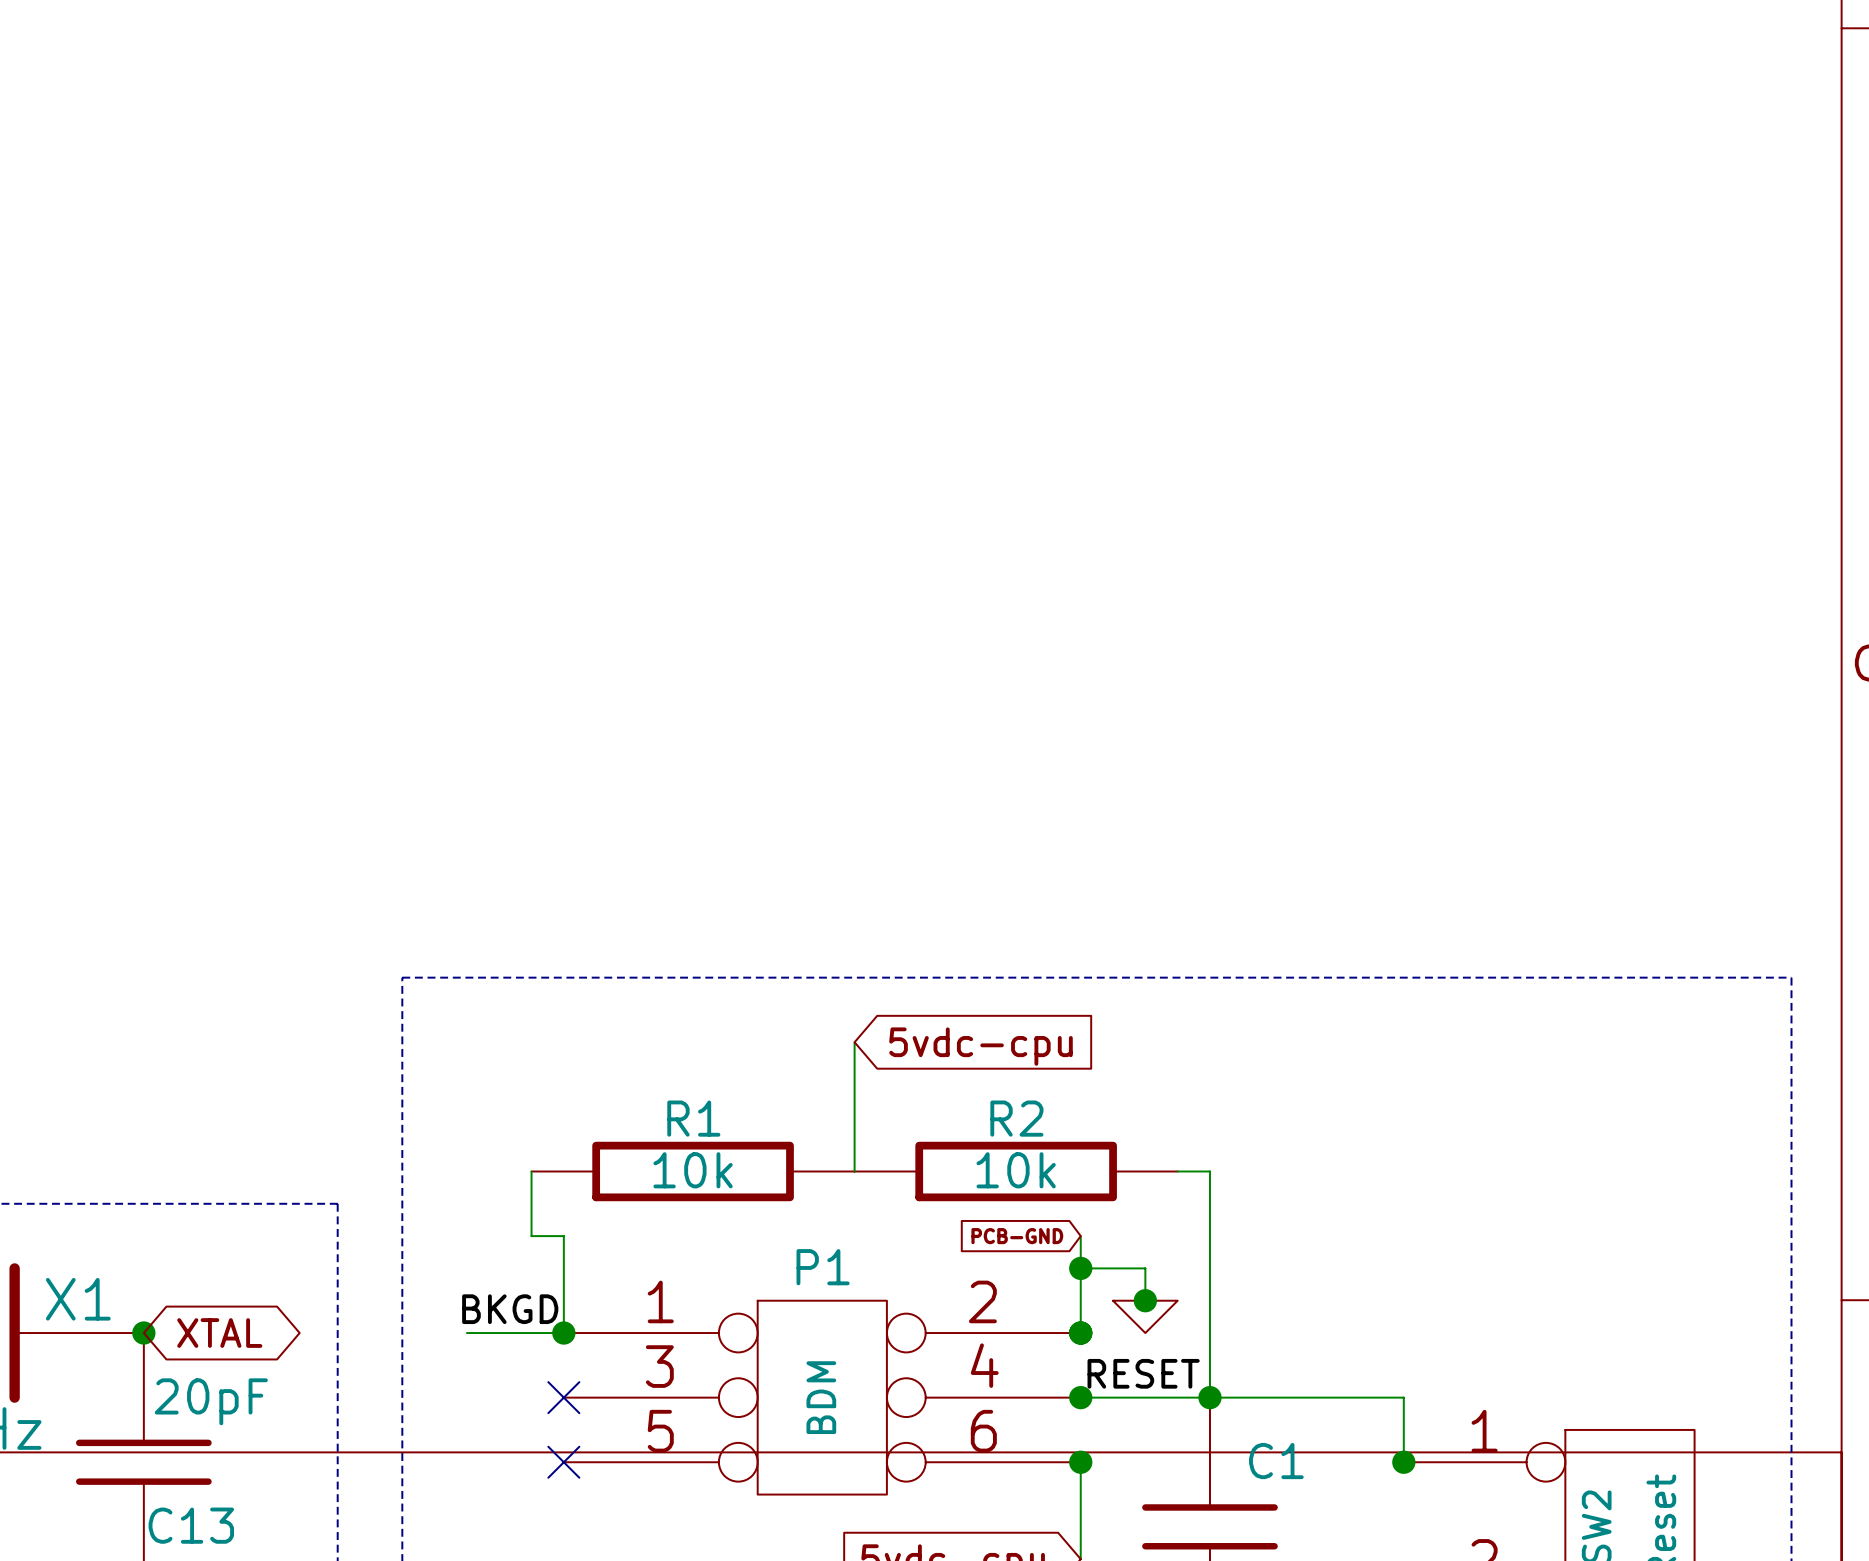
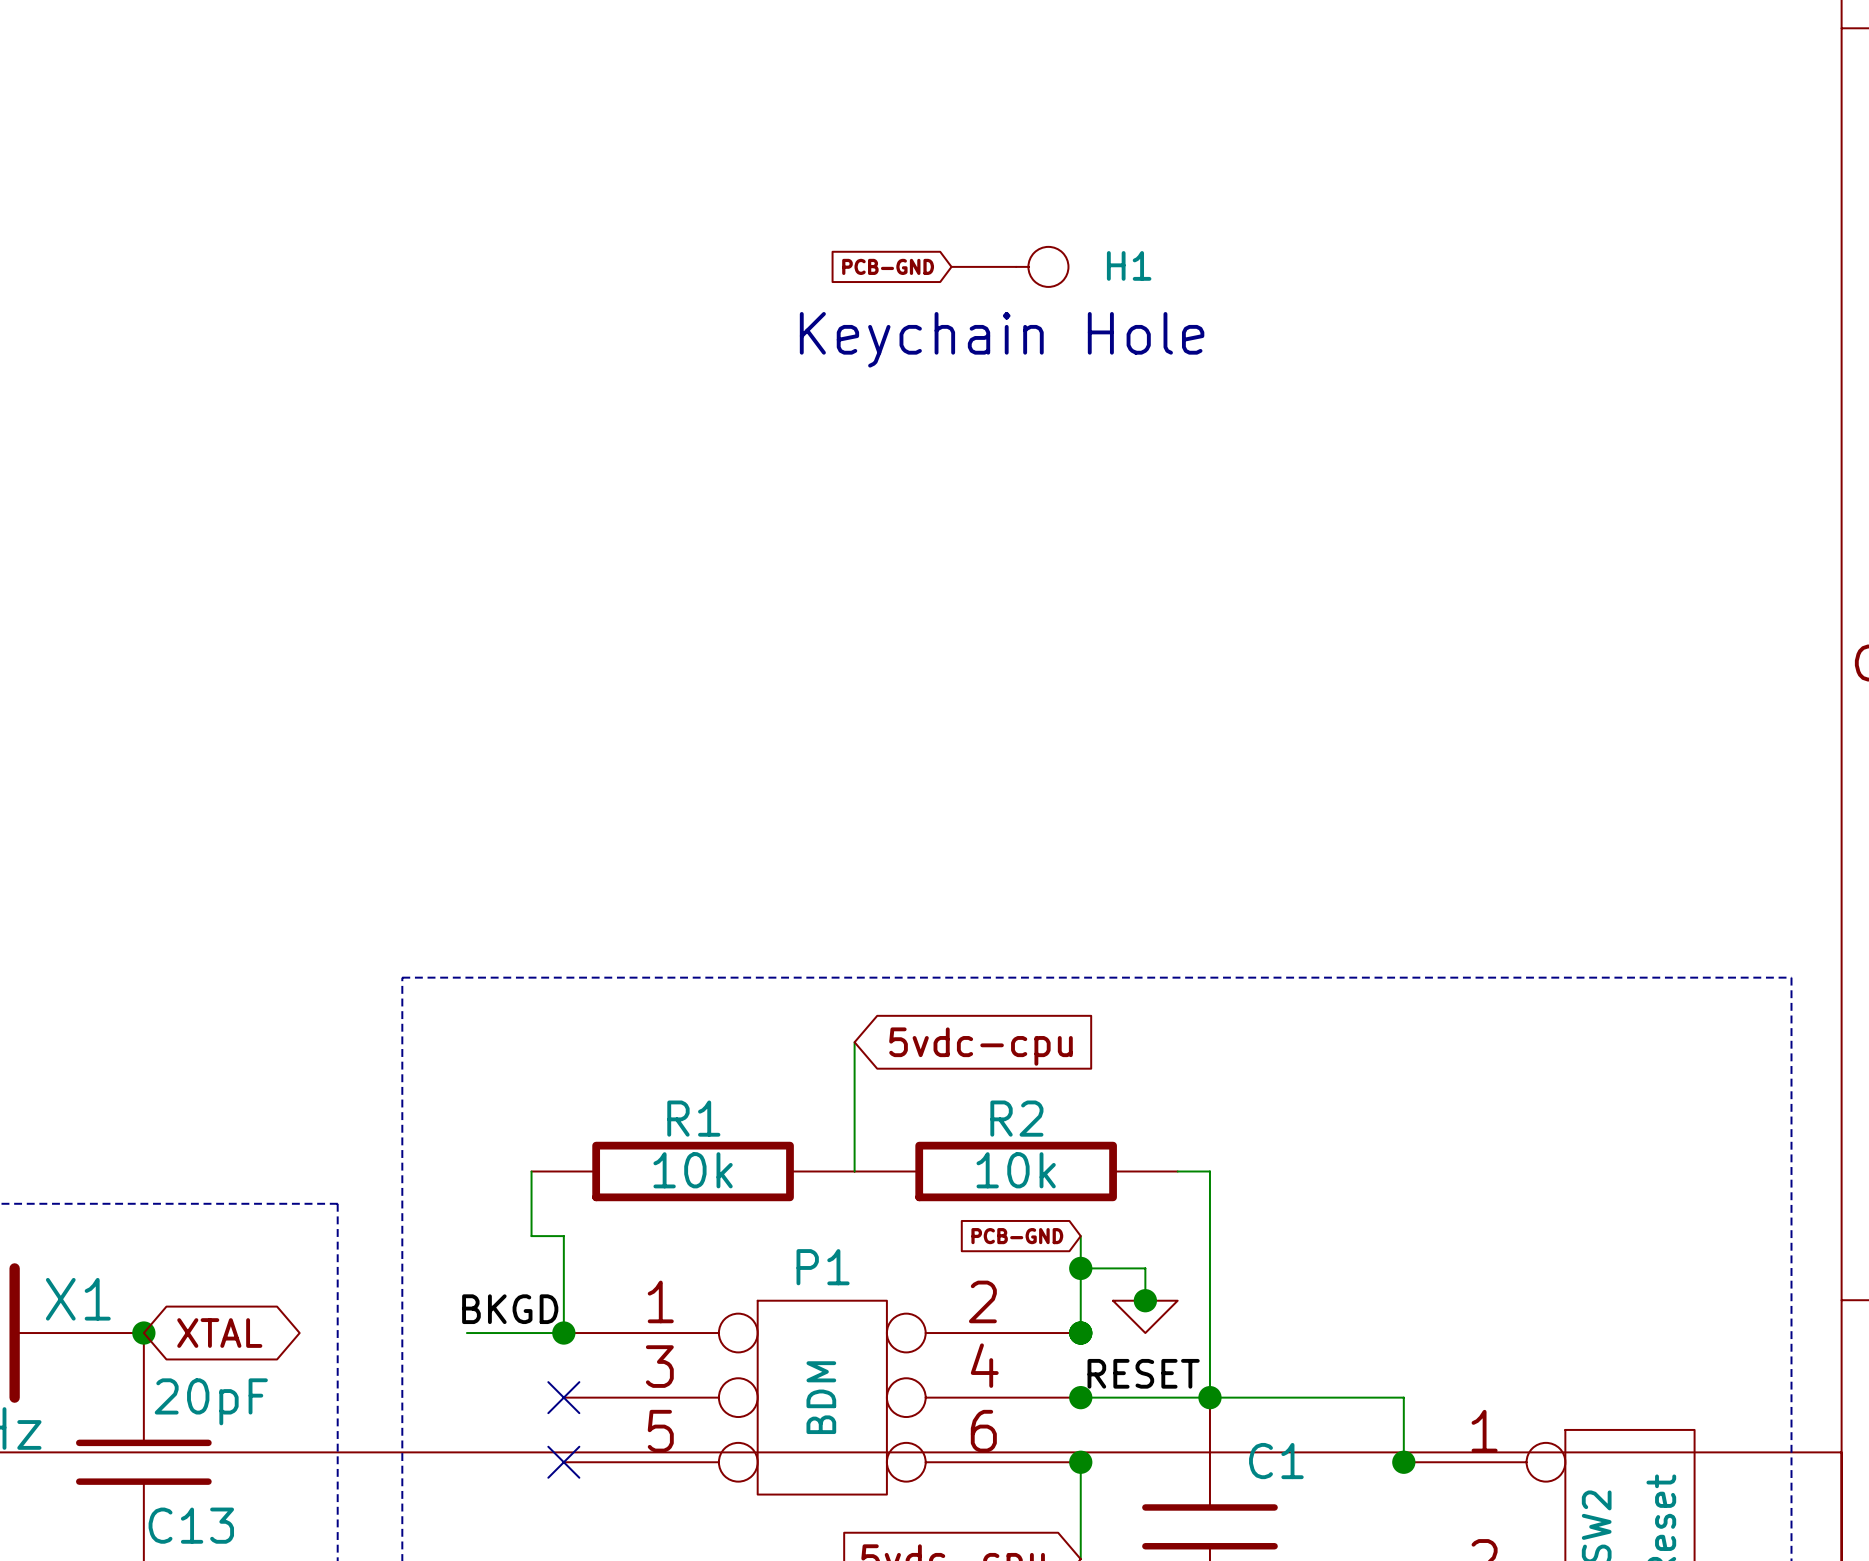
global label: none -> PCB-GND (888, 266)
H1: none -> (1010, 266)
text: none -> Keychain Hole (1002, 339)

